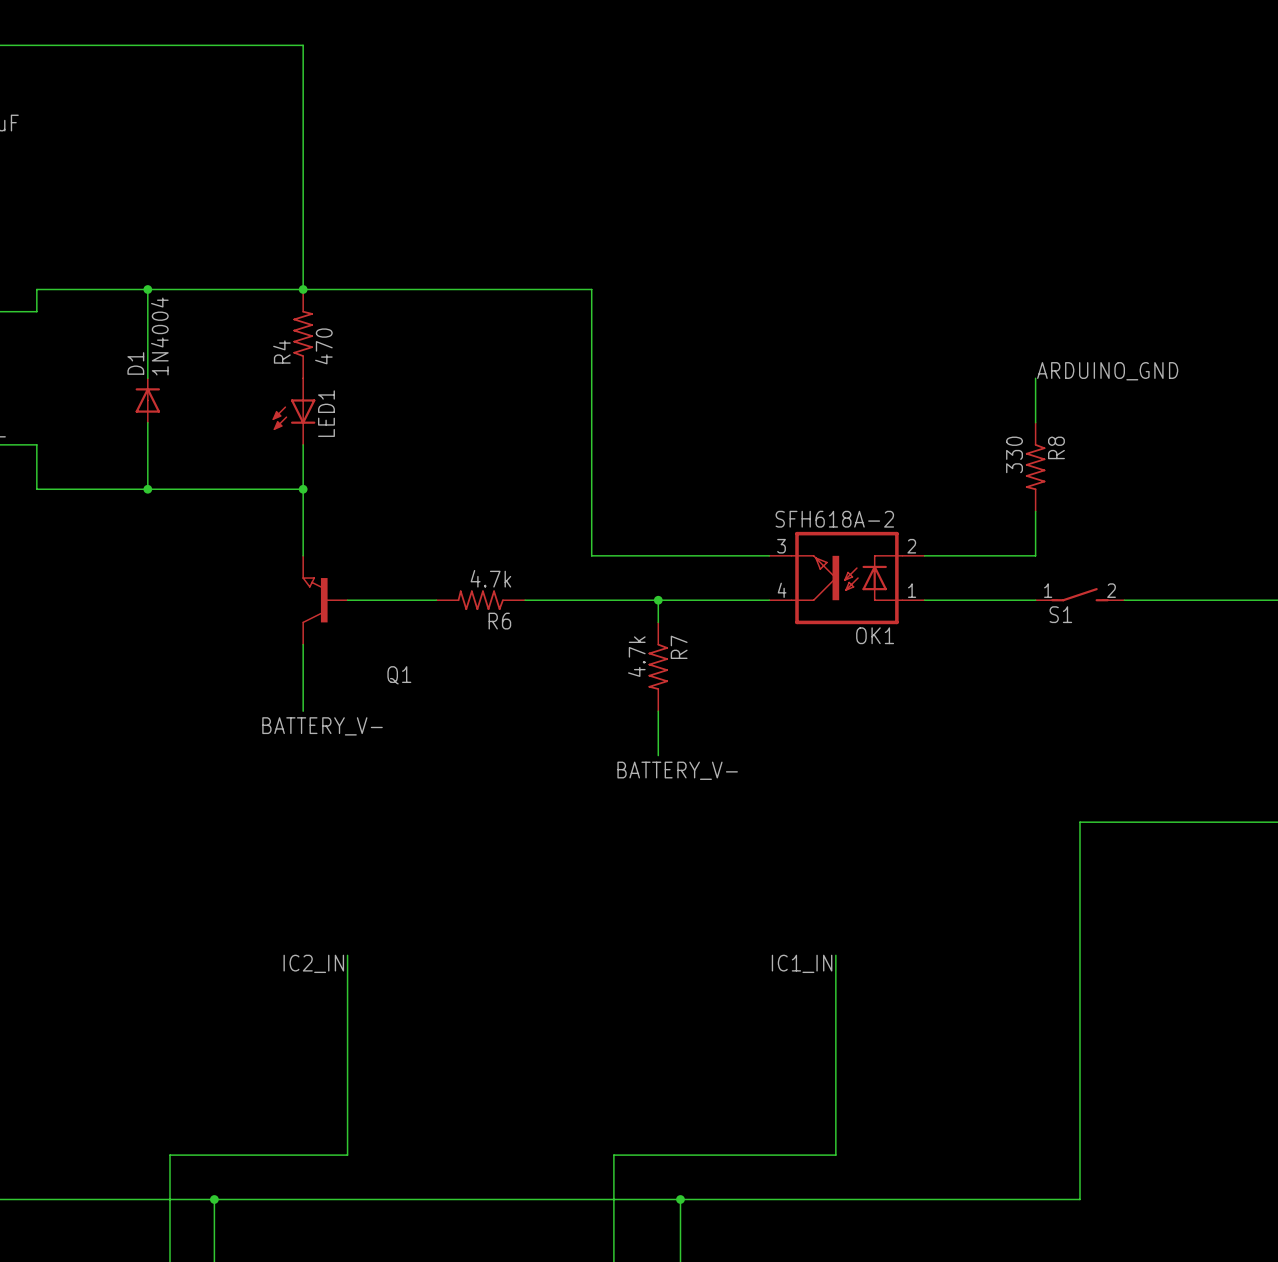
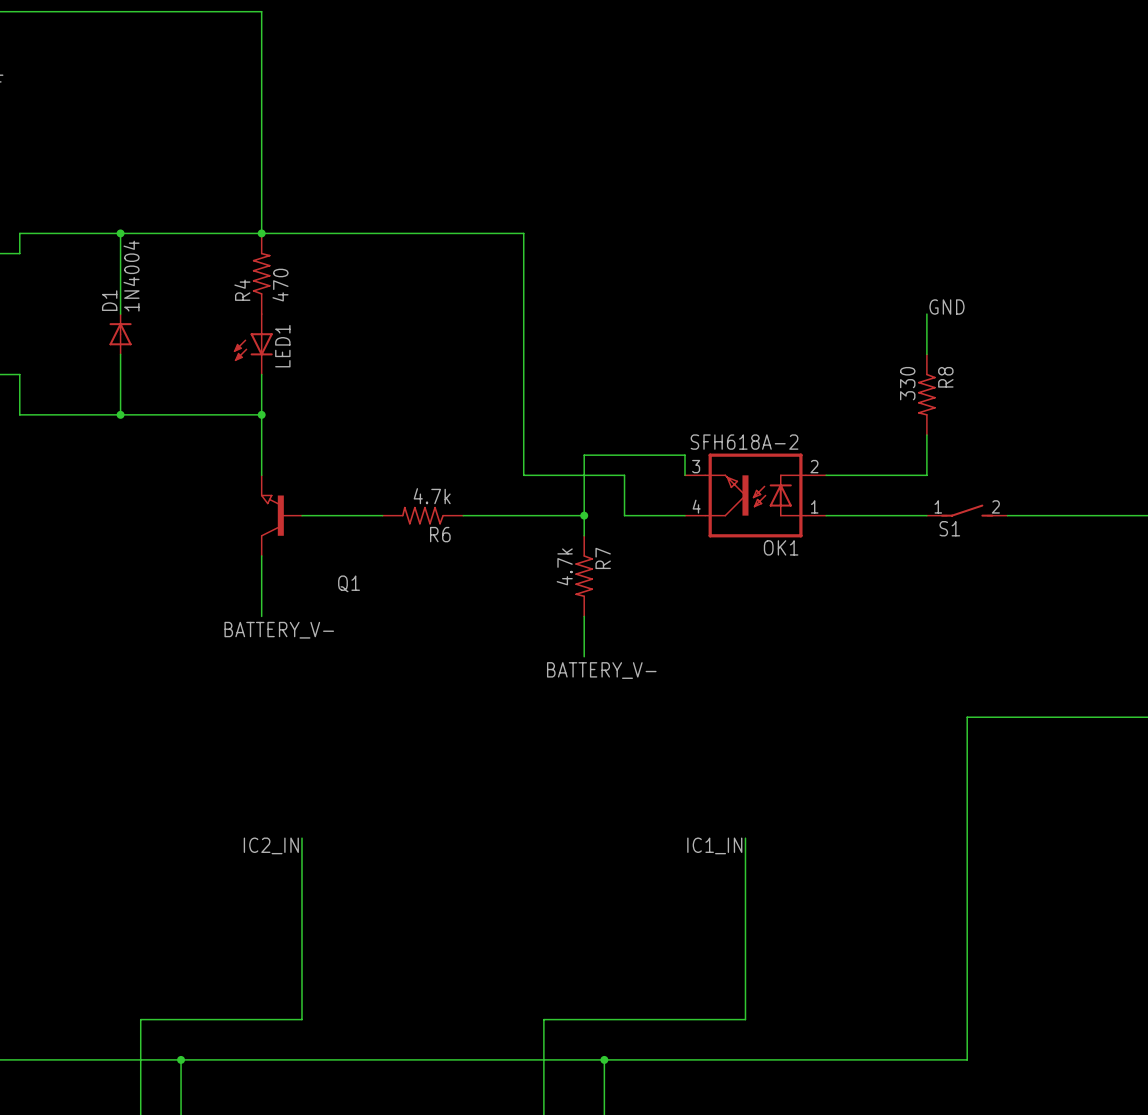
label: ARDUINO_GND (1107, 371) -> GND (946, 307)
wire: (702, 555) (769, 555) -> (584, 515) (584, 455) (685, 455) (685, 475)
wire: (658, 600) (702, 600) -> (624, 475) (624, 515)

